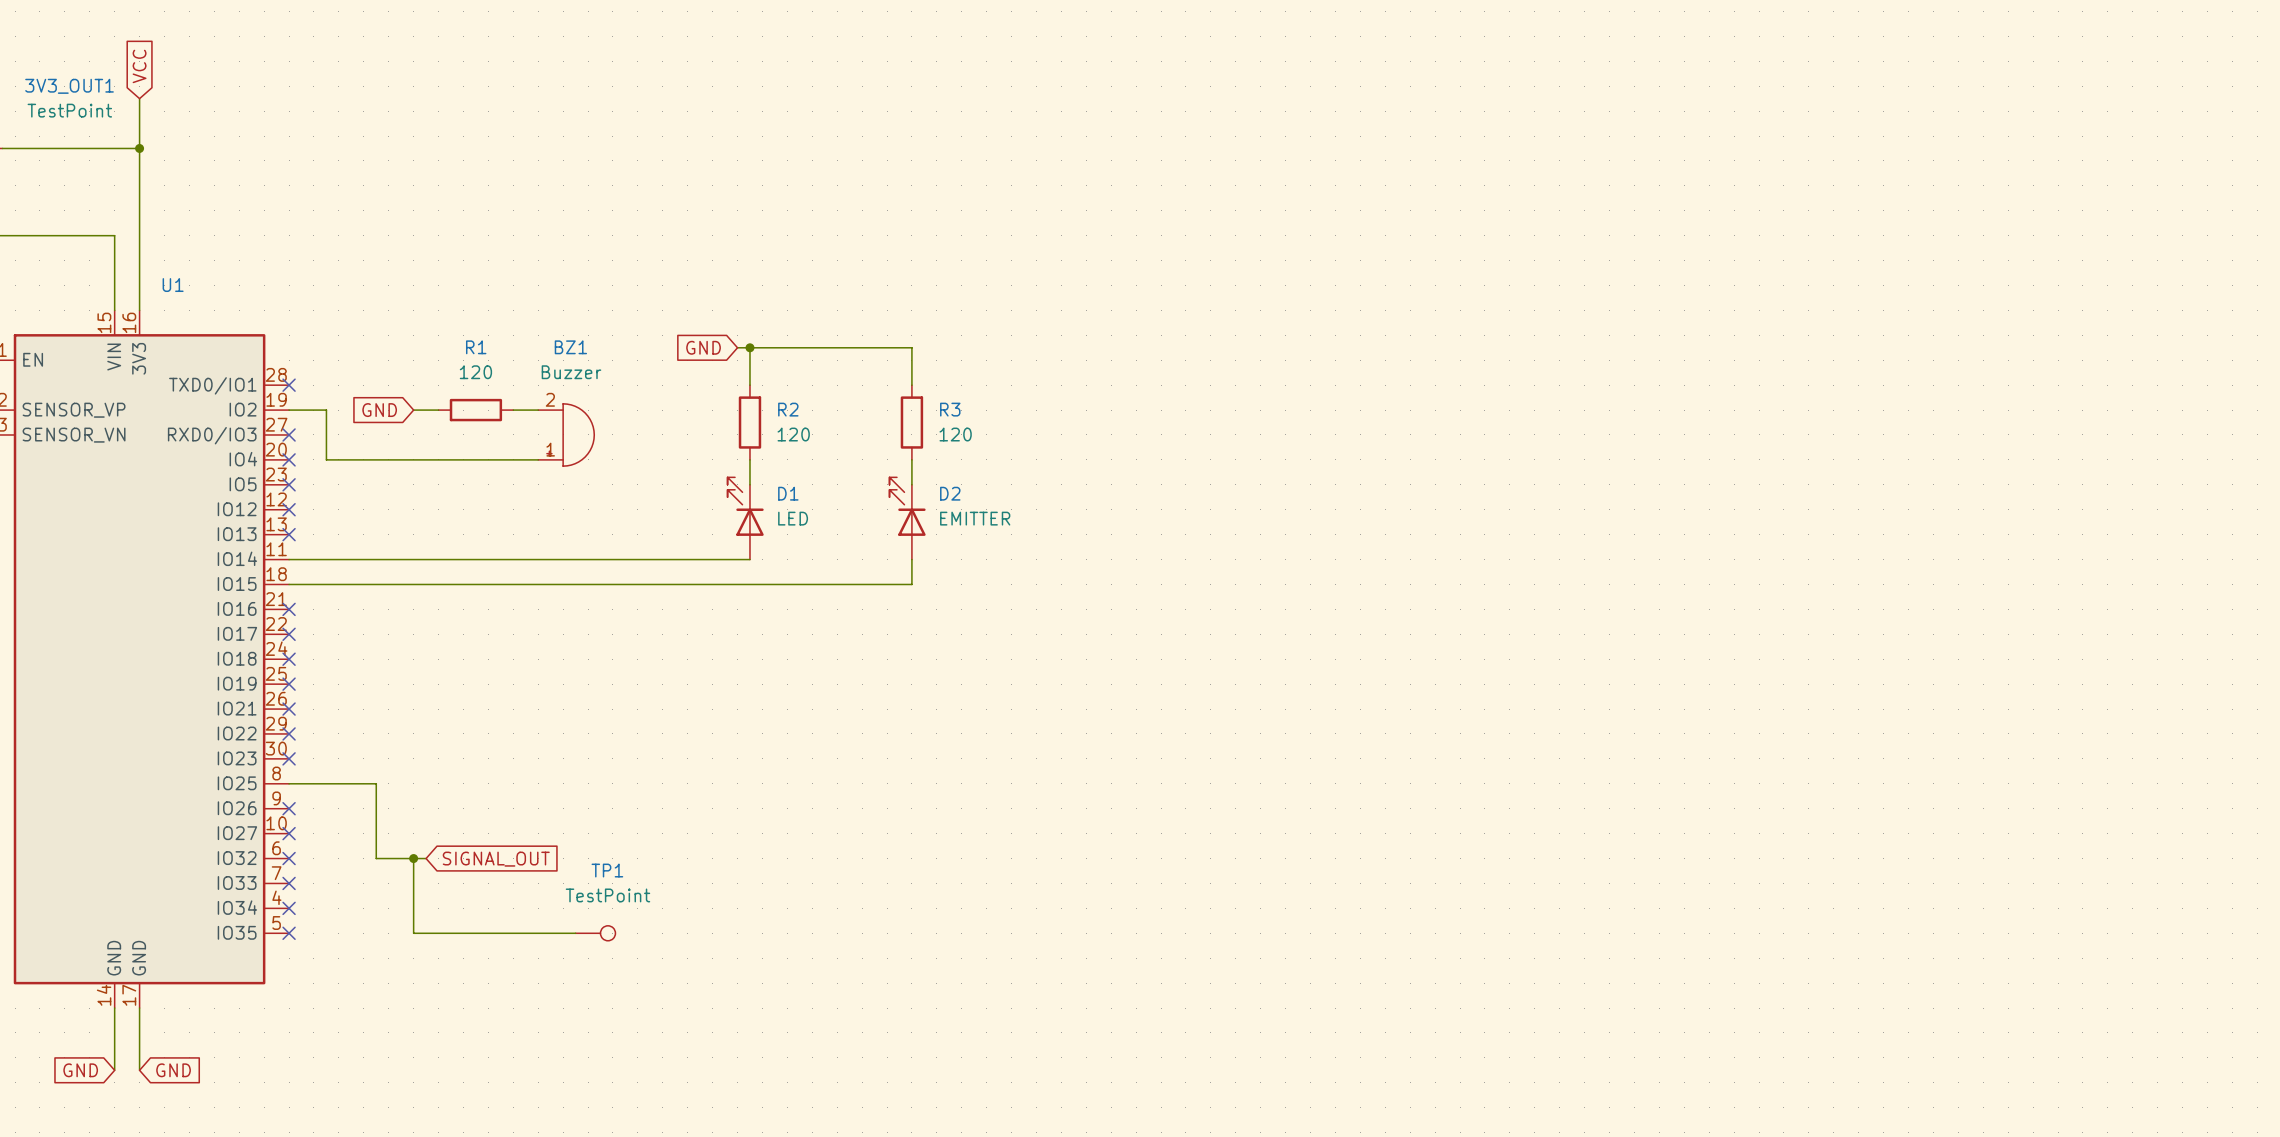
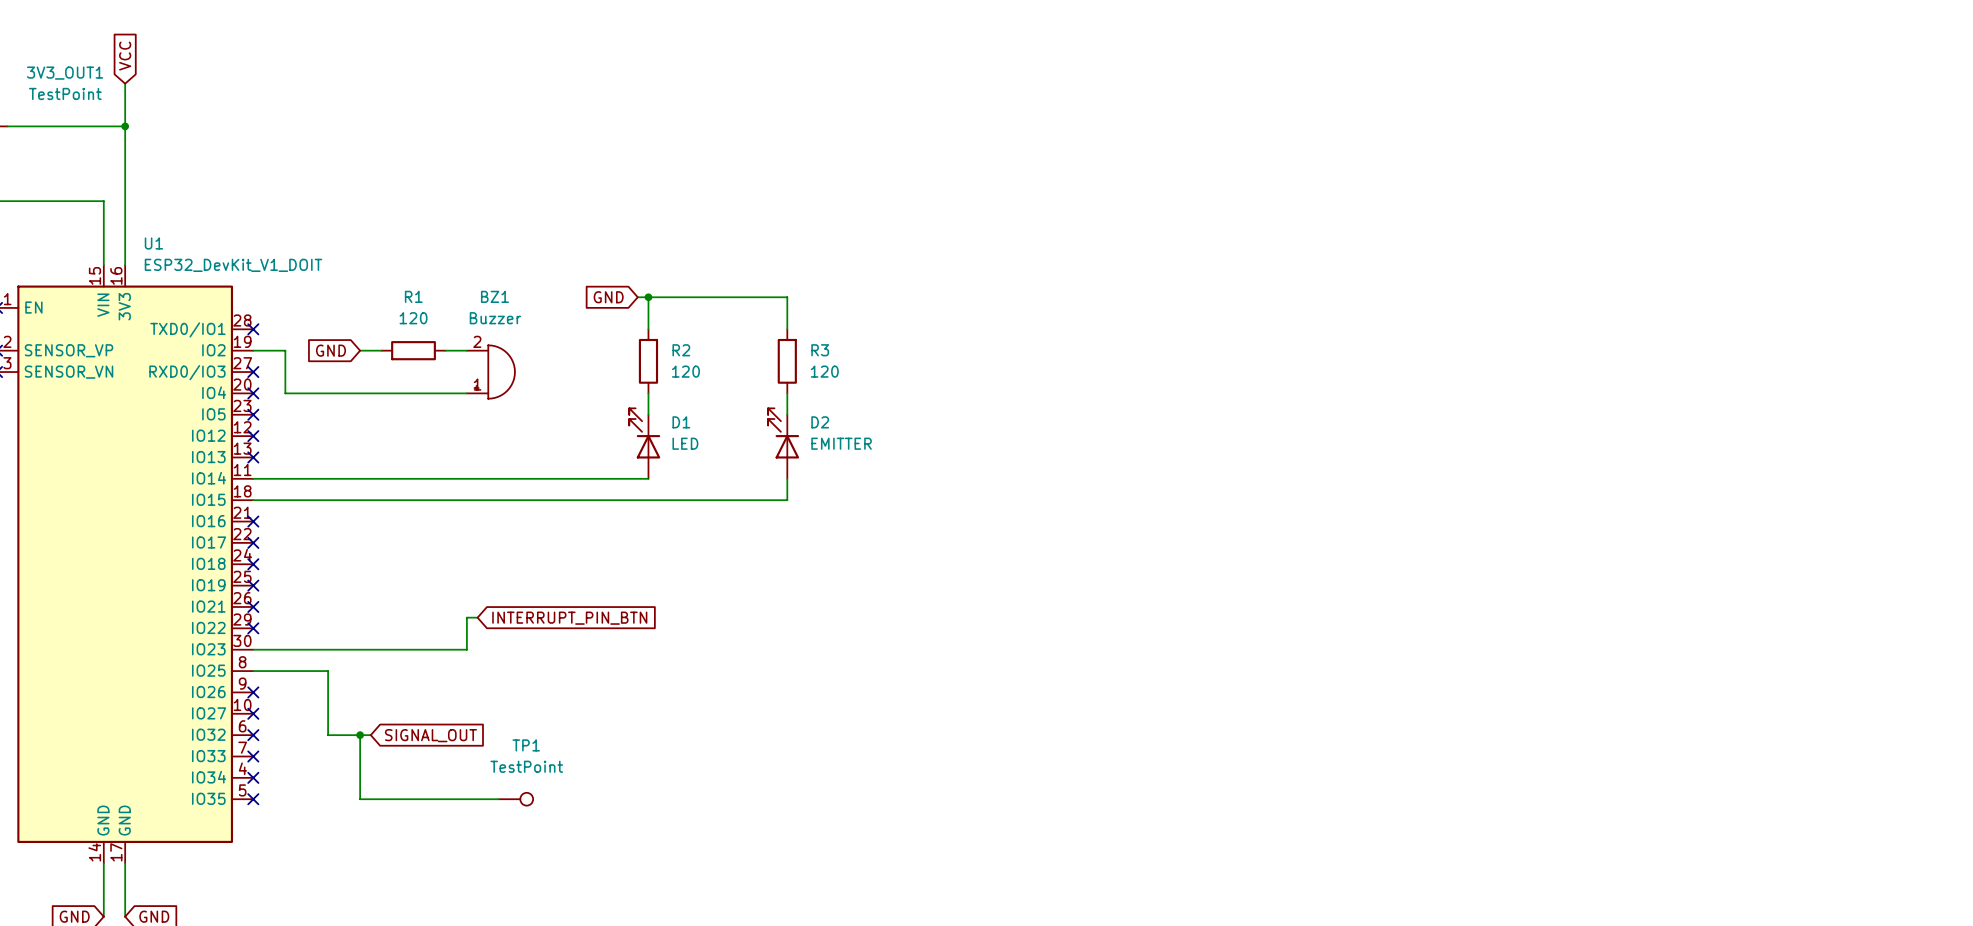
U1 value: none -> ESP32_DevKit_V1_DOIT (233, 265)
wire: none -> (477, 617) (466, 617) (466, 649) (253, 649)
global label: none -> INTERRUPT_PIN_BTN (569, 618)
no-connect mark: (289, 758) -> none

